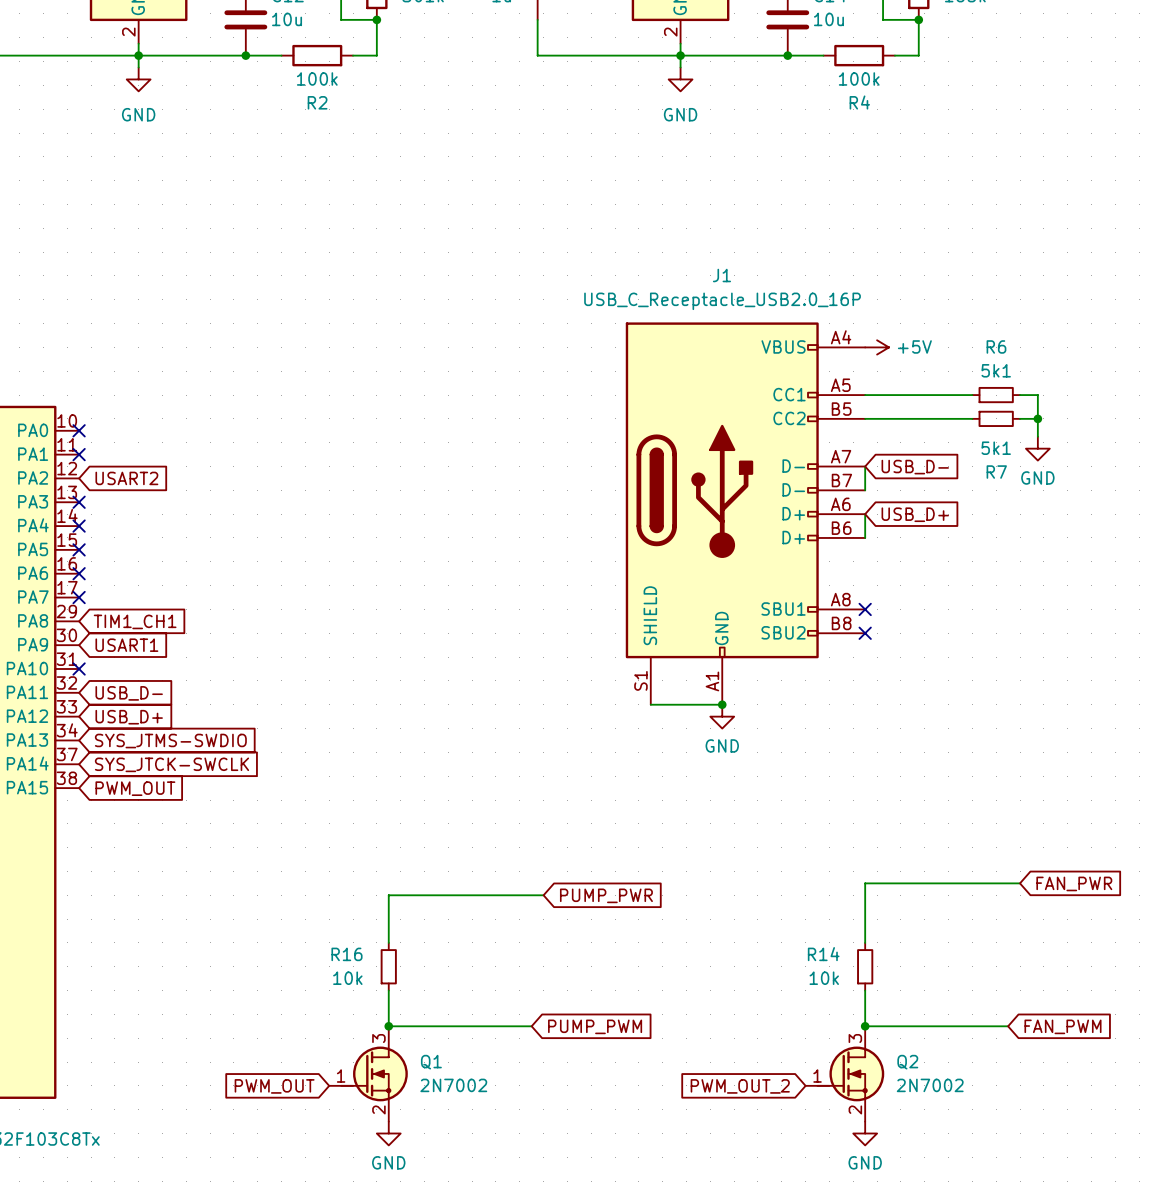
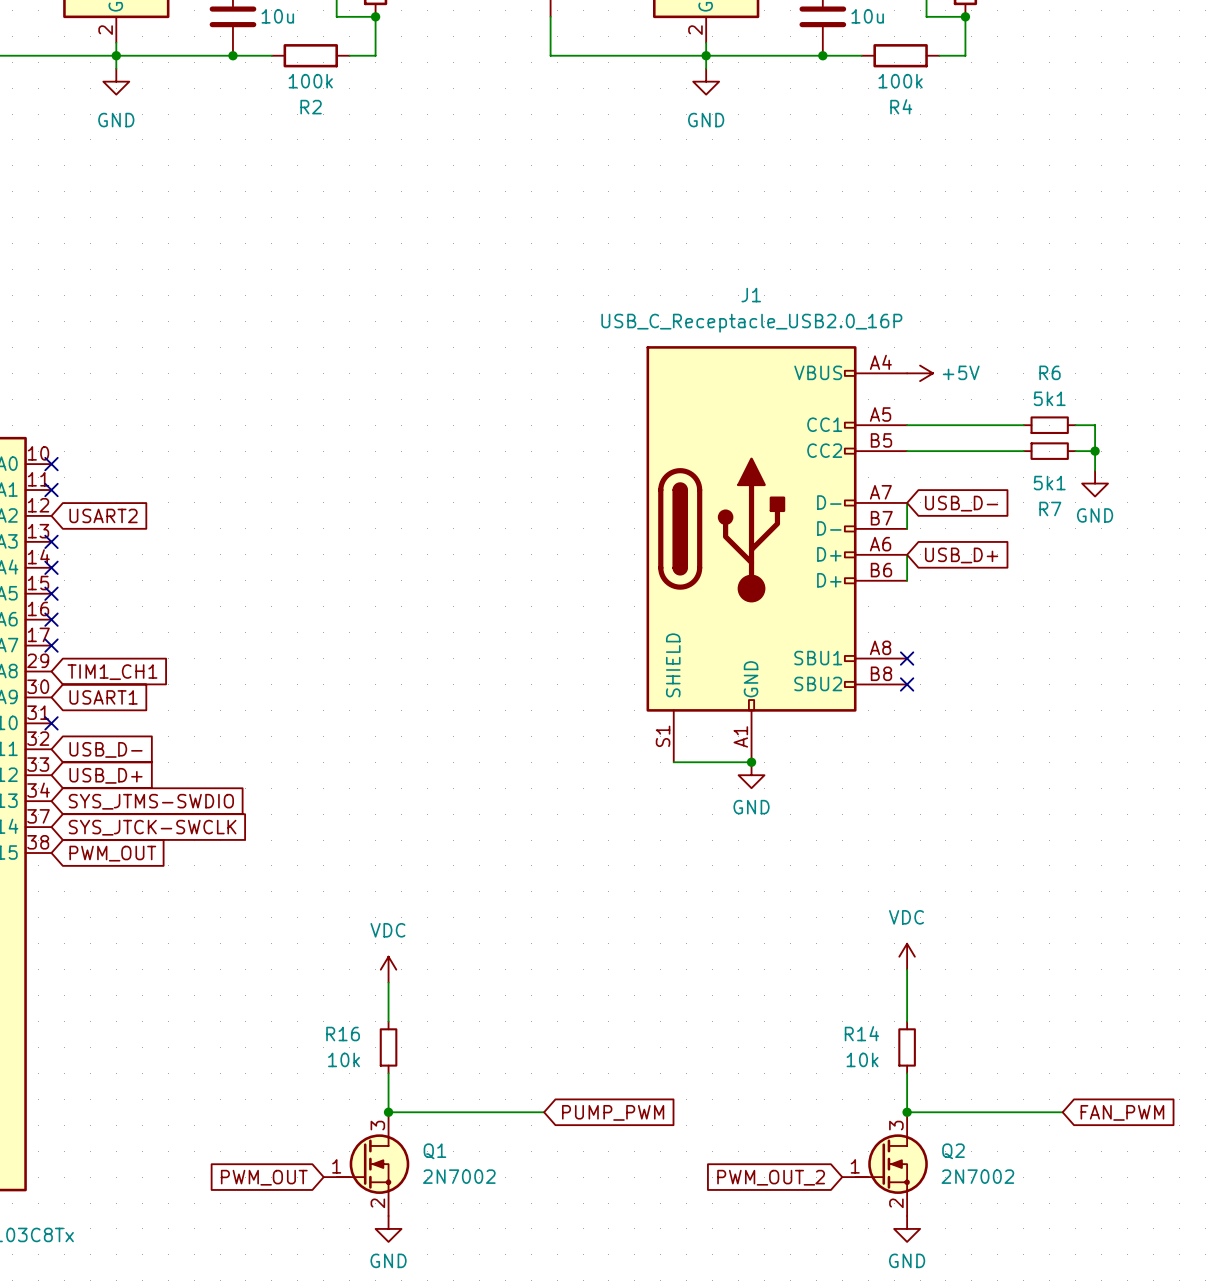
power symbol: none -> VDC (907, 956)
wire: (1020, 883) (865, 883) (865, 895) -> none
global label: FAN_PWR (1074, 883) -> none
power symbol: none -> VDC (388, 969)
wire: (543, 895) (388, 895) (388, 907) -> none
global label: PUMP_PWR (606, 895) -> none

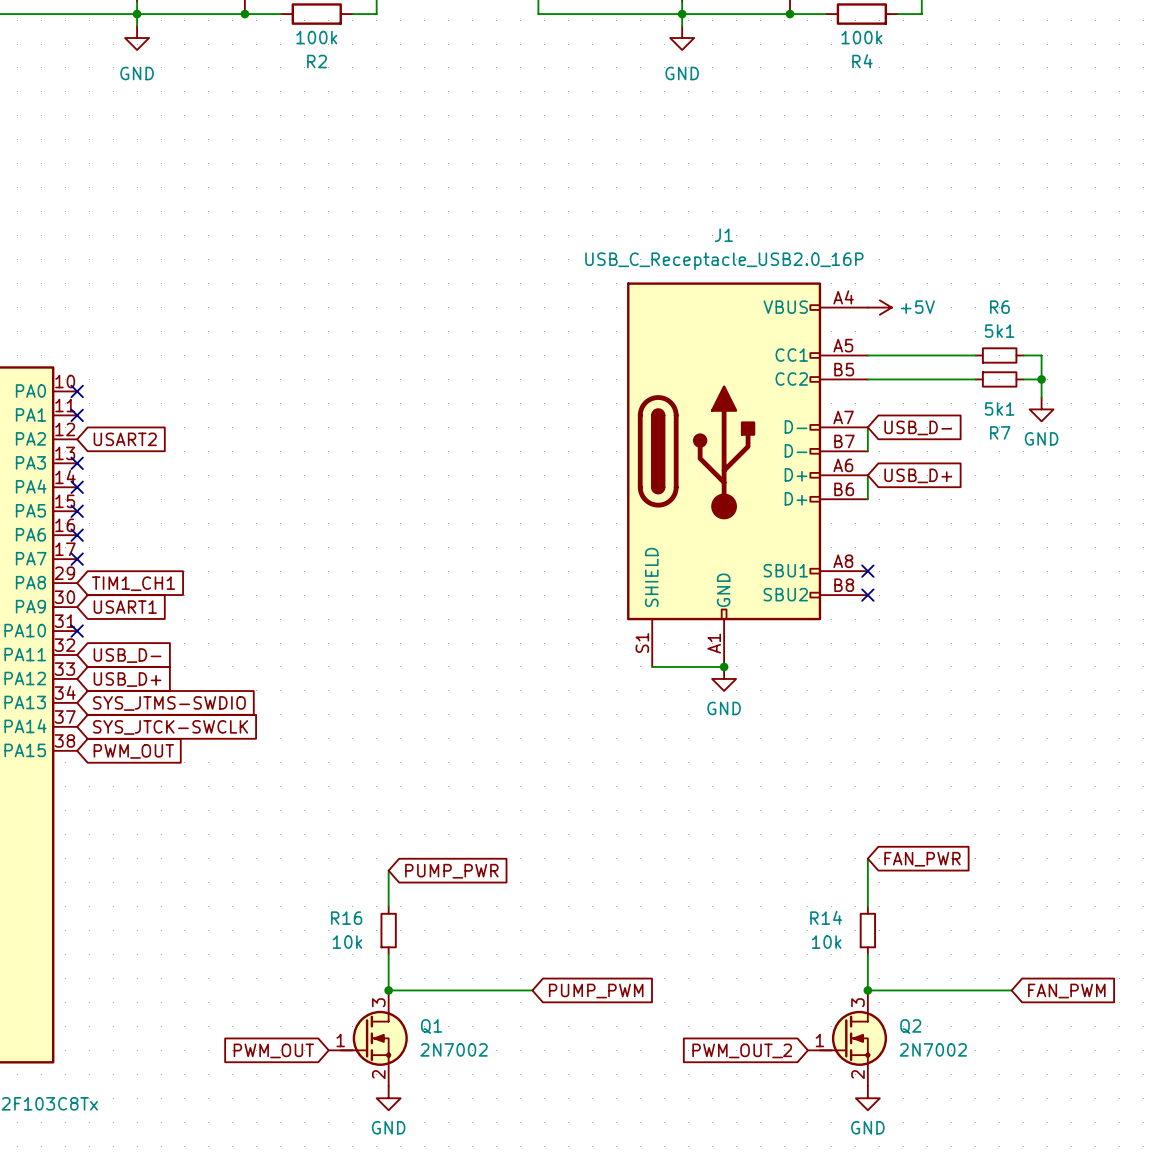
power symbol: VDC (907, 956) -> none
power symbol: VDC (388, 969) -> none
global label: none -> FAN_PWR (922, 859)
global label: none -> PUMP_PWR (451, 871)

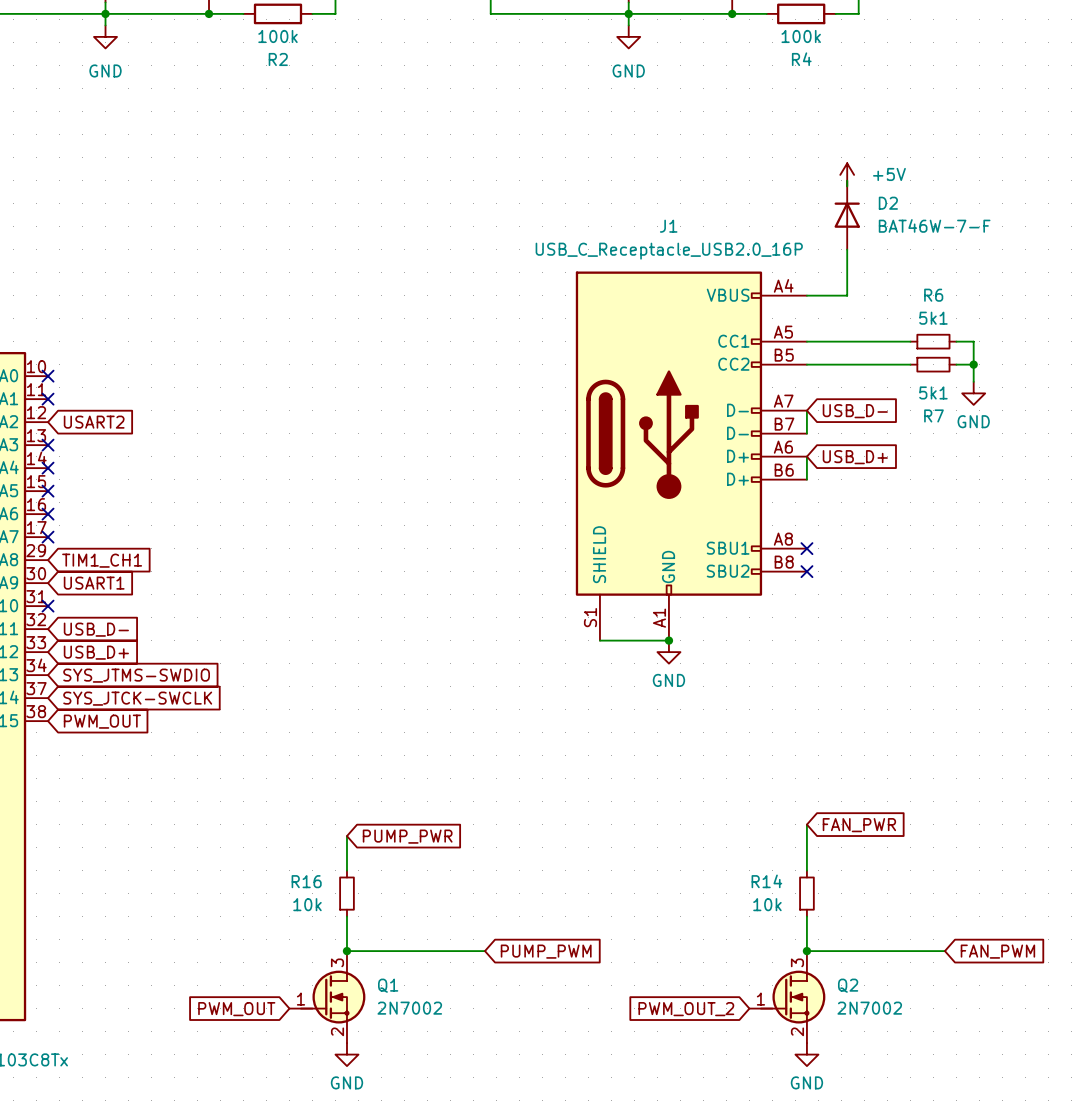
wire: none -> (847, 180) (847, 186)
D2: none -> BAT46W-7-F (847, 215)
wire: none -> (847, 249) (847, 295) (806, 295)
power symbol rotation: 0° (879, 307) -> 90° counterclockwise (847, 174)
power symbol position: +5V (879, 307) -> +5V (847, 174)

